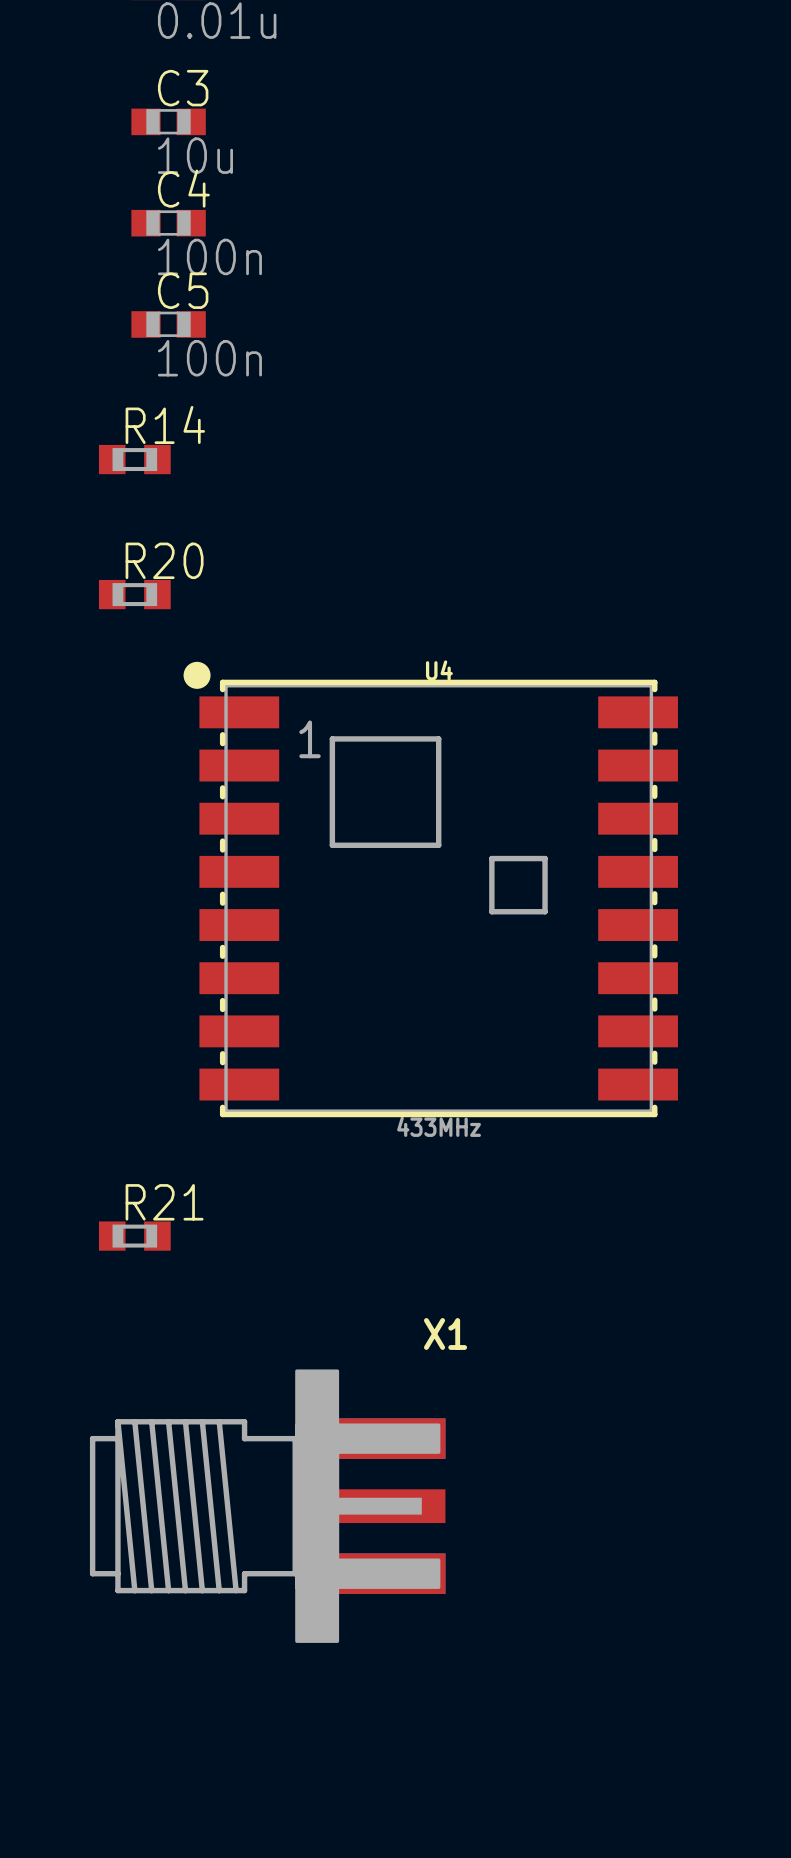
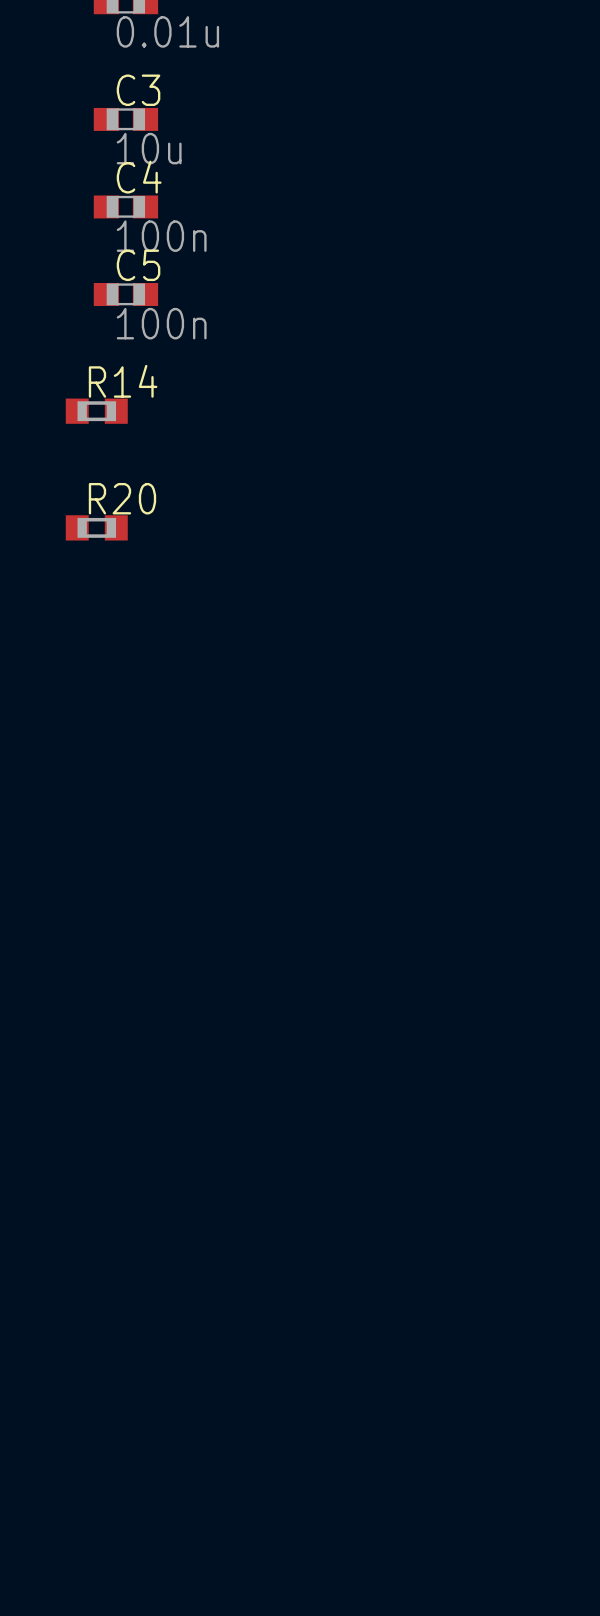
U4: 433MHz (430, 889) -> none
R21: (134, 1236) -> none
X1: (267, 1506) -> none

